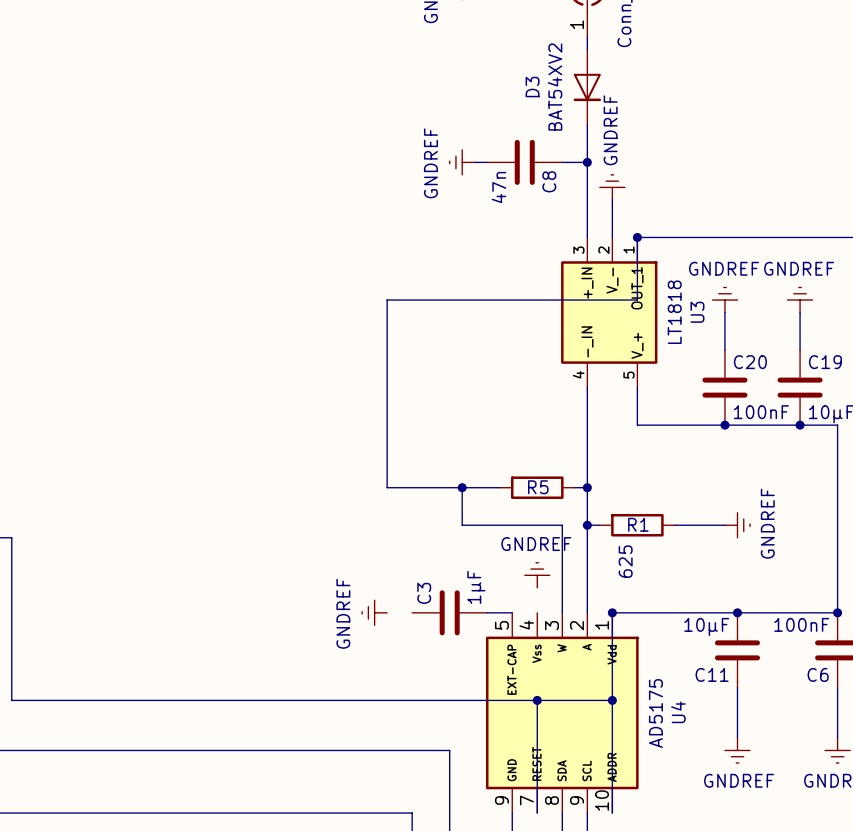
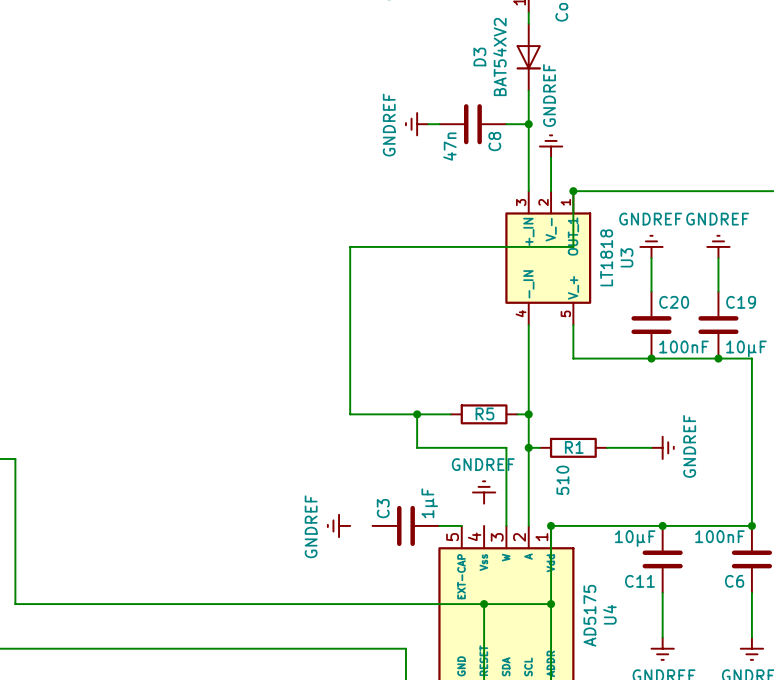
R1 value: 625 (625, 561) -> 510 (562, 480)

